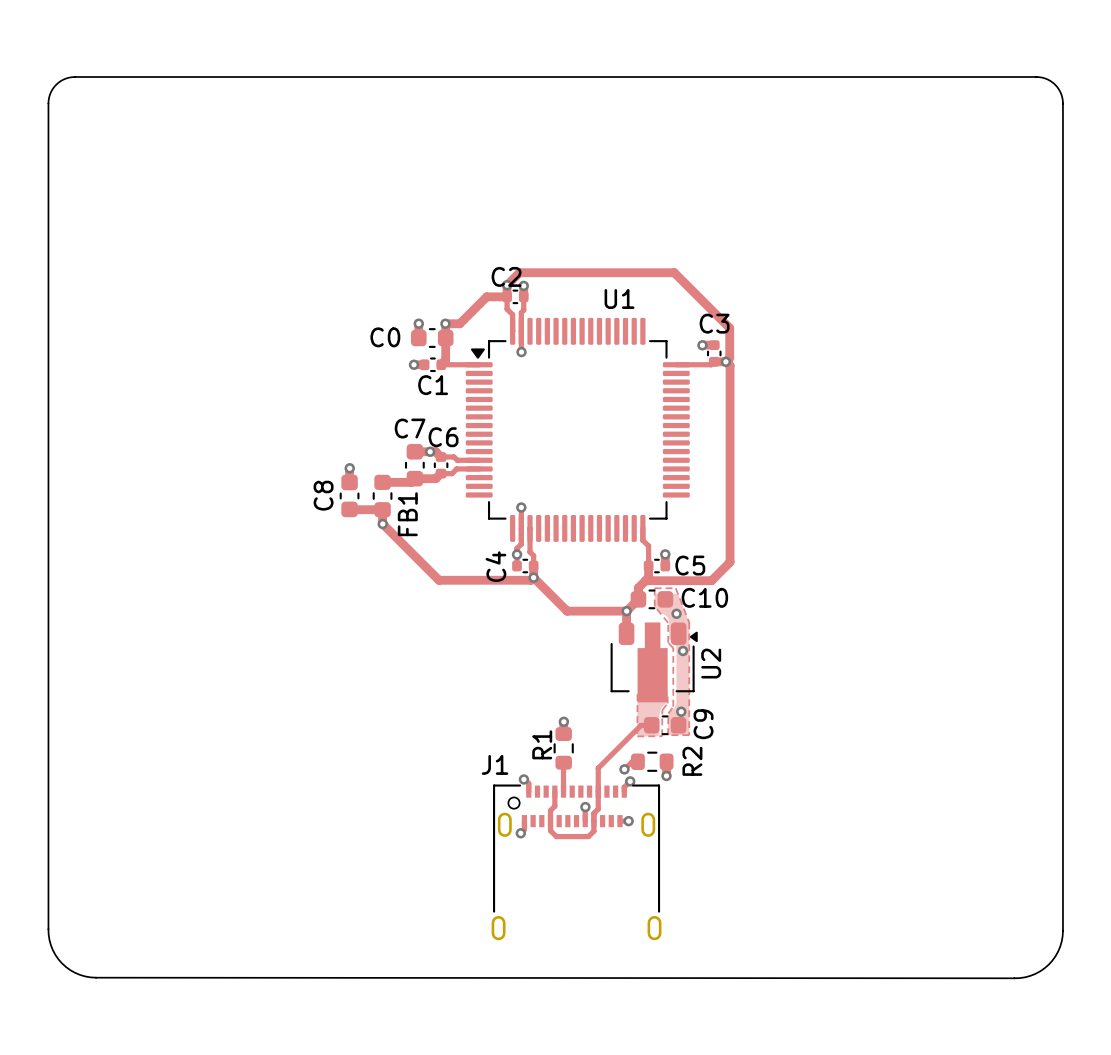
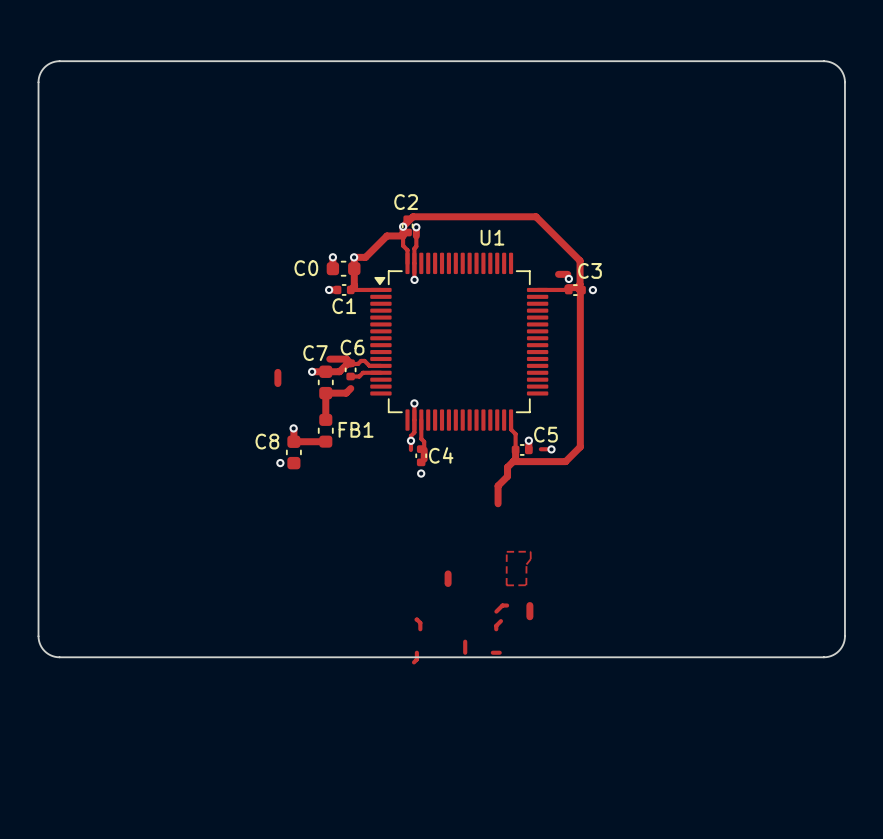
C2 rotation: 0° (515, 296) -> 90° clockwise (407, 225)
via: (702, 345) -> none
via: none -> (568, 278)
C3 rotation: 0° (714, 353) -> 90° clockwise (575, 290)
via: (725, 361) -> none
via: none -> (592, 290)
C7 name position: C7 (410, 428) -> C7 (315, 353)
via: (430, 451) -> none
track: (441, 456) (453, 456) (457, 460) (464, 460) -> (312, 371) (339, 371) (347, 363) (358, 363) (361, 360) (364, 360) (369, 365)
C7 position: (414, 465) -> (325, 382)
via: none -> (312, 371)
via: (349, 468) -> none
track: (440, 473) (435, 478) (414, 478) (411, 482) (382, 482) -> none
track: none -> (350, 388) (346, 393) (325, 393) (325, 419)
C8 name rotation: 0° (323, 495) -> 90° clockwise (267, 441)
C8 position: (349, 495) -> (293, 452)
FB1 position: (382, 496) -> (325, 430)
track: (349, 509) (382, 509) (382, 523) (439, 580) (531, 580) (533, 577) (567, 611) (626, 611) -> none
FB1 name rotation: 0° (407, 514) -> 90° clockwise (356, 429)
via position: (382, 524) -> (293, 428)
track: none -> (293, 428) (293, 441) (325, 441)
track: none -> (540, 449) (551, 449)
C5 name position: C5 (690, 565) -> C5 (545, 434)
via: none -> (551, 449)
C4 name position: C4 (495, 566) -> C4 (441, 455)
C4 rotation: 0° (525, 566) -> 90° clockwise (421, 455)
via position: (533, 577) -> (421, 473)
via: none -> (280, 463)
zone outline: (654, 588) (675, 588) (689, 622) (689, 735) (668, 735) (668, 713) (673, 706) (673, 648) (668, 642) (668, 622) (654, 606) (654, 588) -> none
C10: (651, 599) -> none
via: (626, 611) -> none
via: (676, 613) -> none
via: (683, 650) -> none
U2: (654, 662) -> none
via: (681, 711) -> none
via: (563, 721) -> none
track: (651, 725) (640, 725) (598, 768) (598, 809) (594, 813) -> none
C9: (665, 725) -> none
R1: (563, 748) -> none
R2: (652, 761) -> none
track: (563, 762) (563, 791) -> none
via: (624, 769) -> none
via: (666, 775) -> none
via: (523, 779) -> none
via: (630, 781) -> none
track: (554, 791) (554, 806) (550, 810) (550, 830) (556, 836) (588, 836) (593, 831) (593, 814) -> none
board edge: (48, 800) (49, 939) (55, 954) (62, 963) (70, 970) (85, 976) (1014, 978) (1030, 975) (1044, 968) (1055, 956) (1061, 941) (1062, 800) -> (38, 636) (39, 643) (44, 651) (52, 656) (59, 657) (823, 657) (830, 656) (838, 651) (842, 645) (844, 636)
via: (585, 807) -> none
via: (628, 821) -> none
via: (520, 833) -> none
J1: (576, 862) -> none

